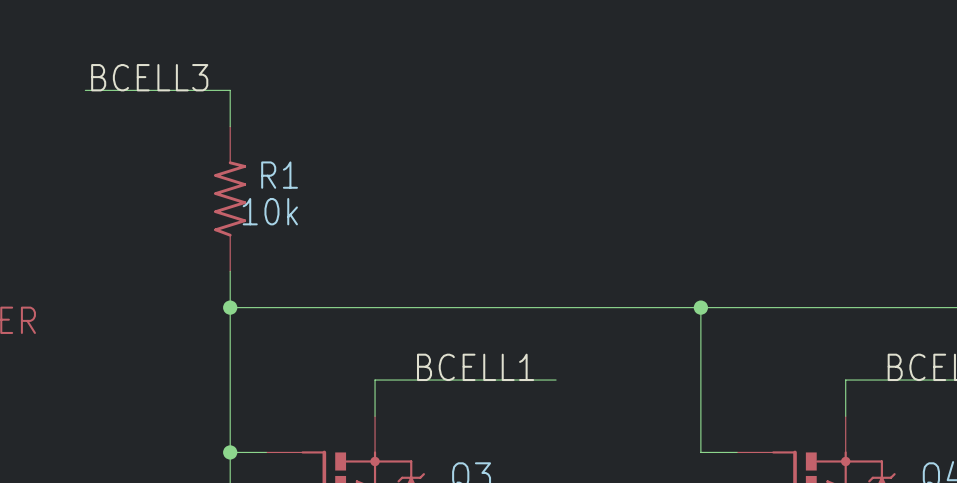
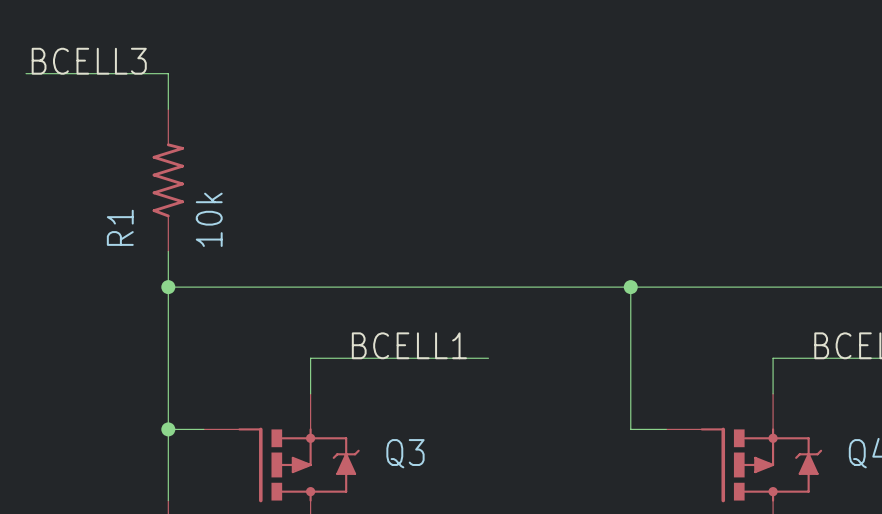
R1 name rotation: 0° (279, 175) -> 90° counterclockwise (120, 227)
R1 name position: R1 (279, 175) -> R1 (120, 227)
R1 value rotation: 0° (270, 211) -> 90° counterclockwise (209, 219)

